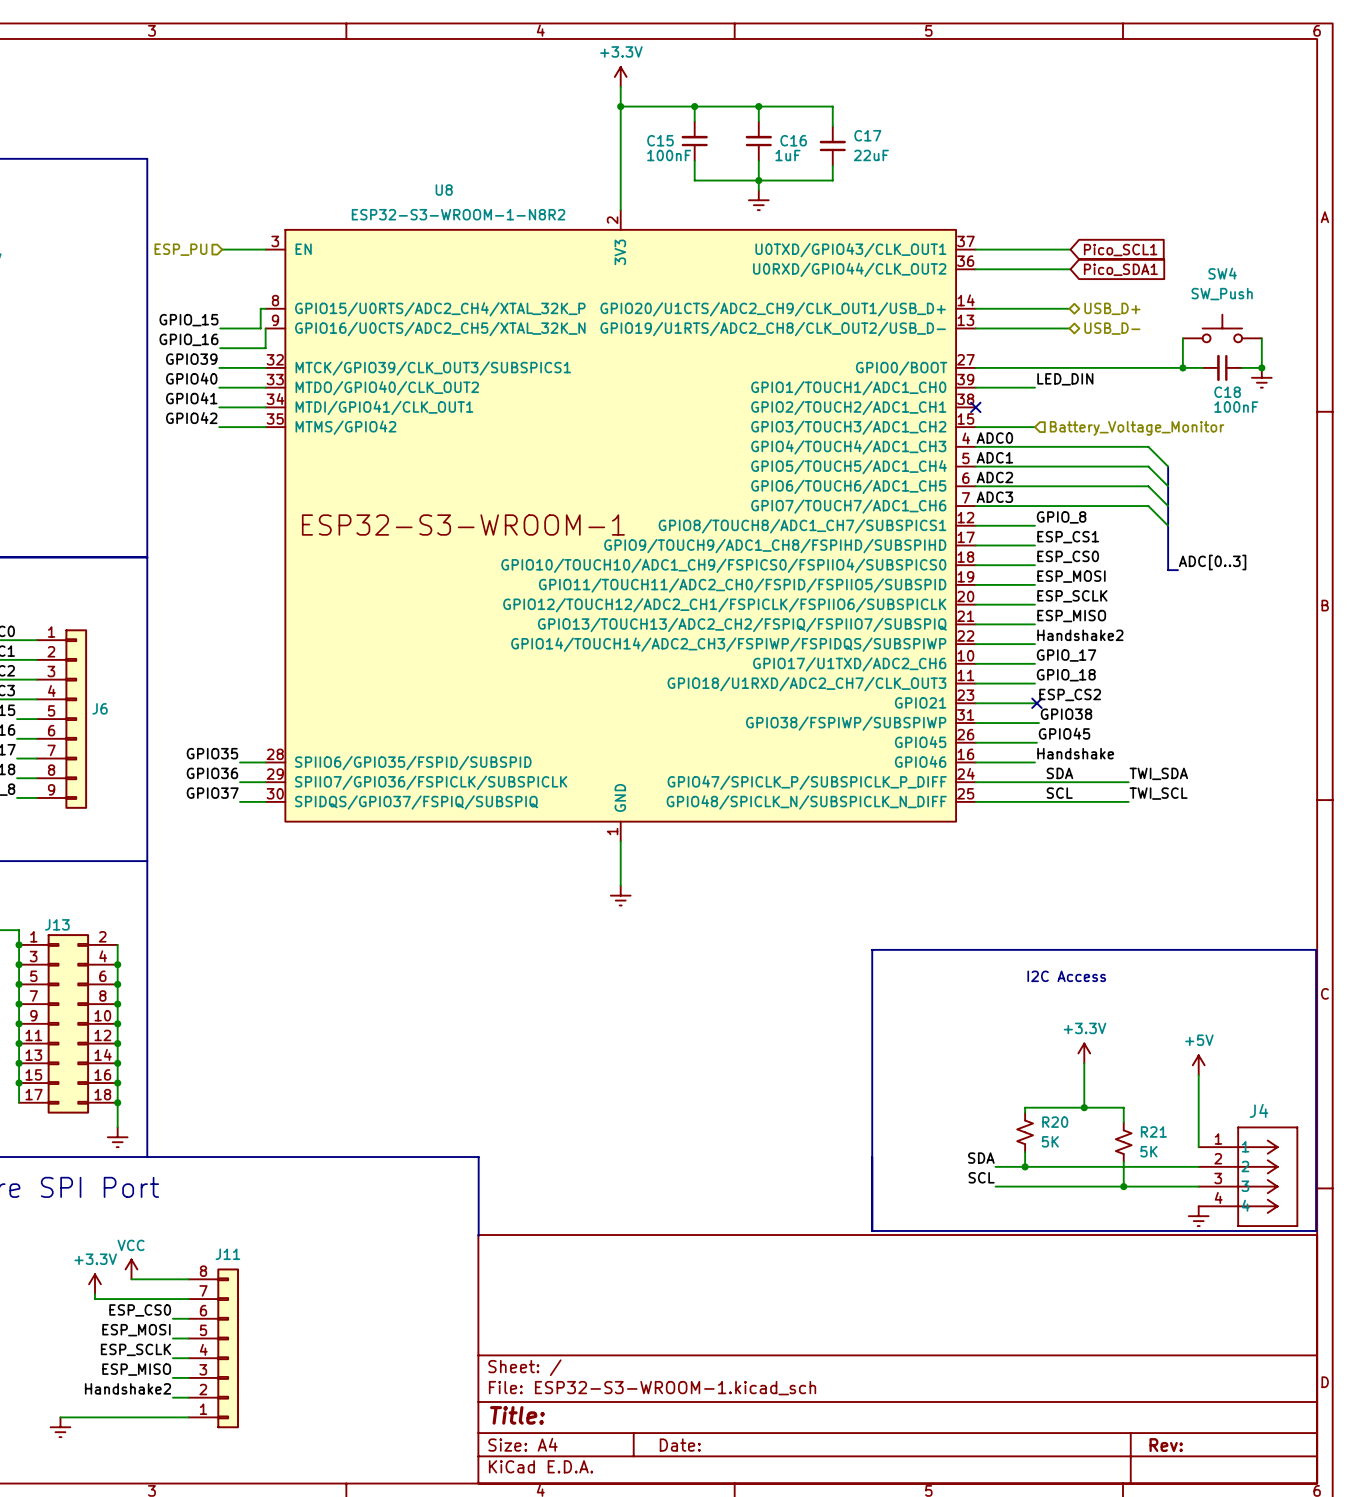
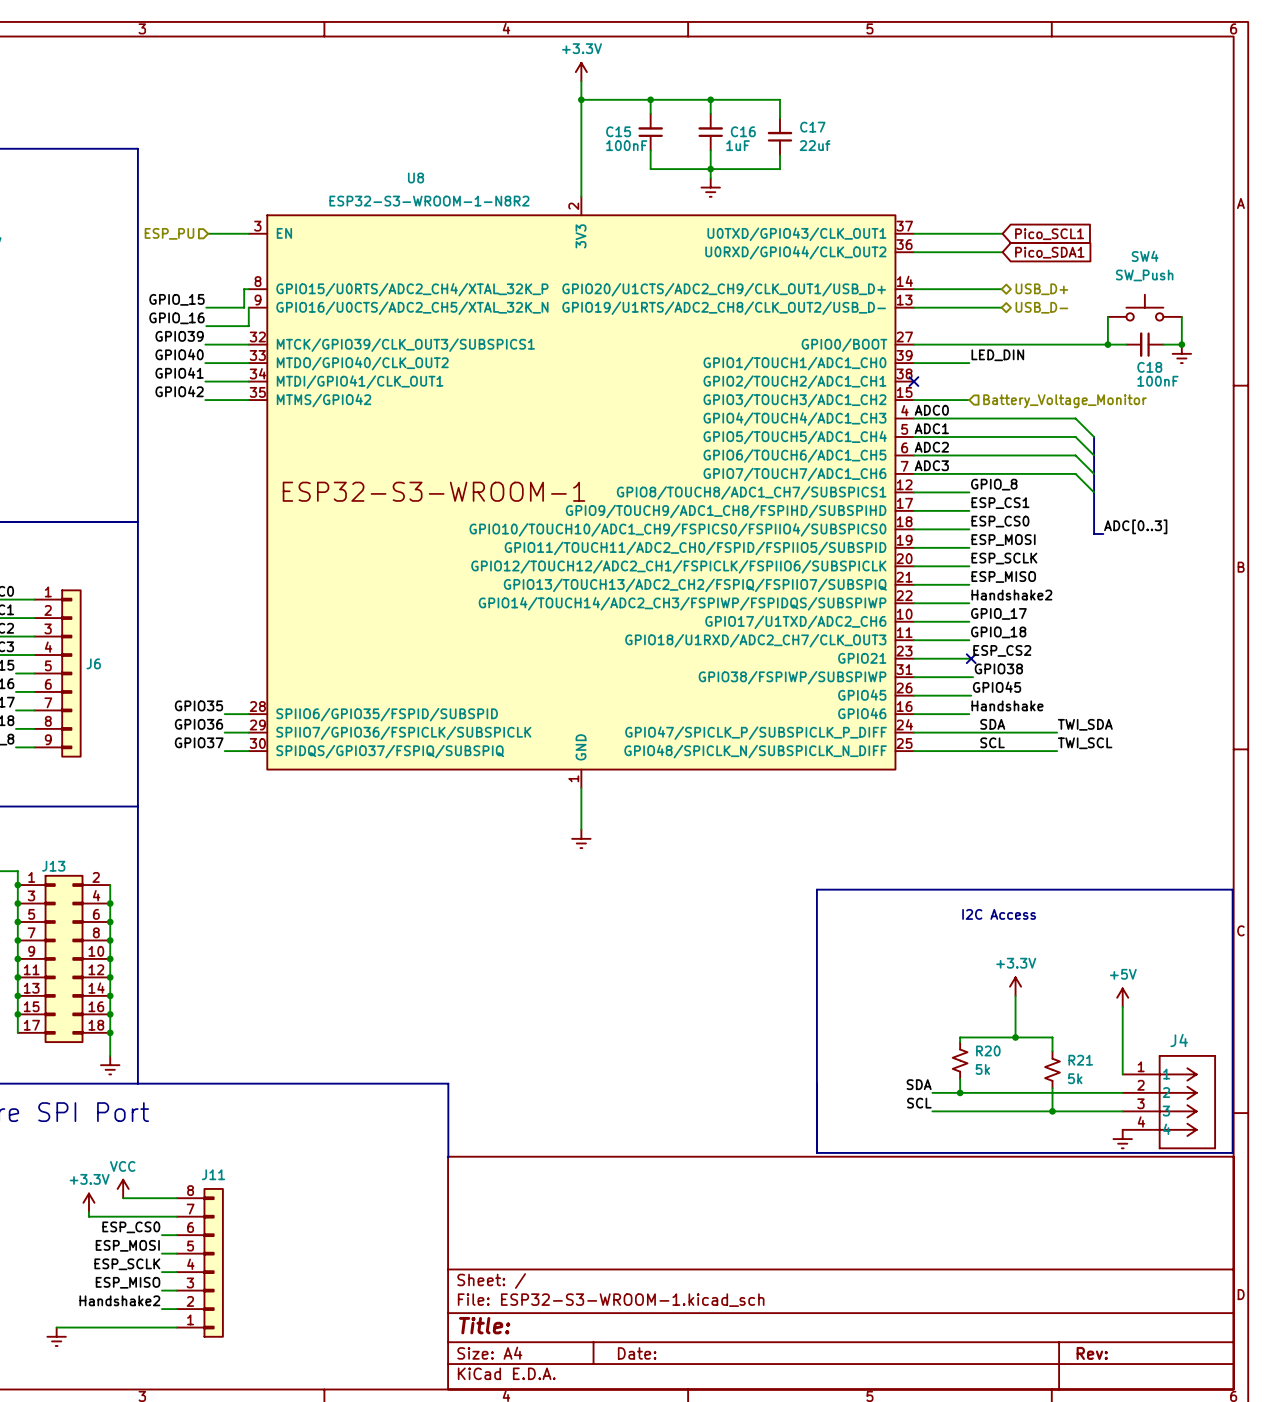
C17 value: 22uF (871, 155) -> 22uf (815, 145)
R20 value: 5K (1050, 1141) -> 5k (982, 1069)
R21 value: 5K (1148, 1151) -> 5k (1075, 1078)

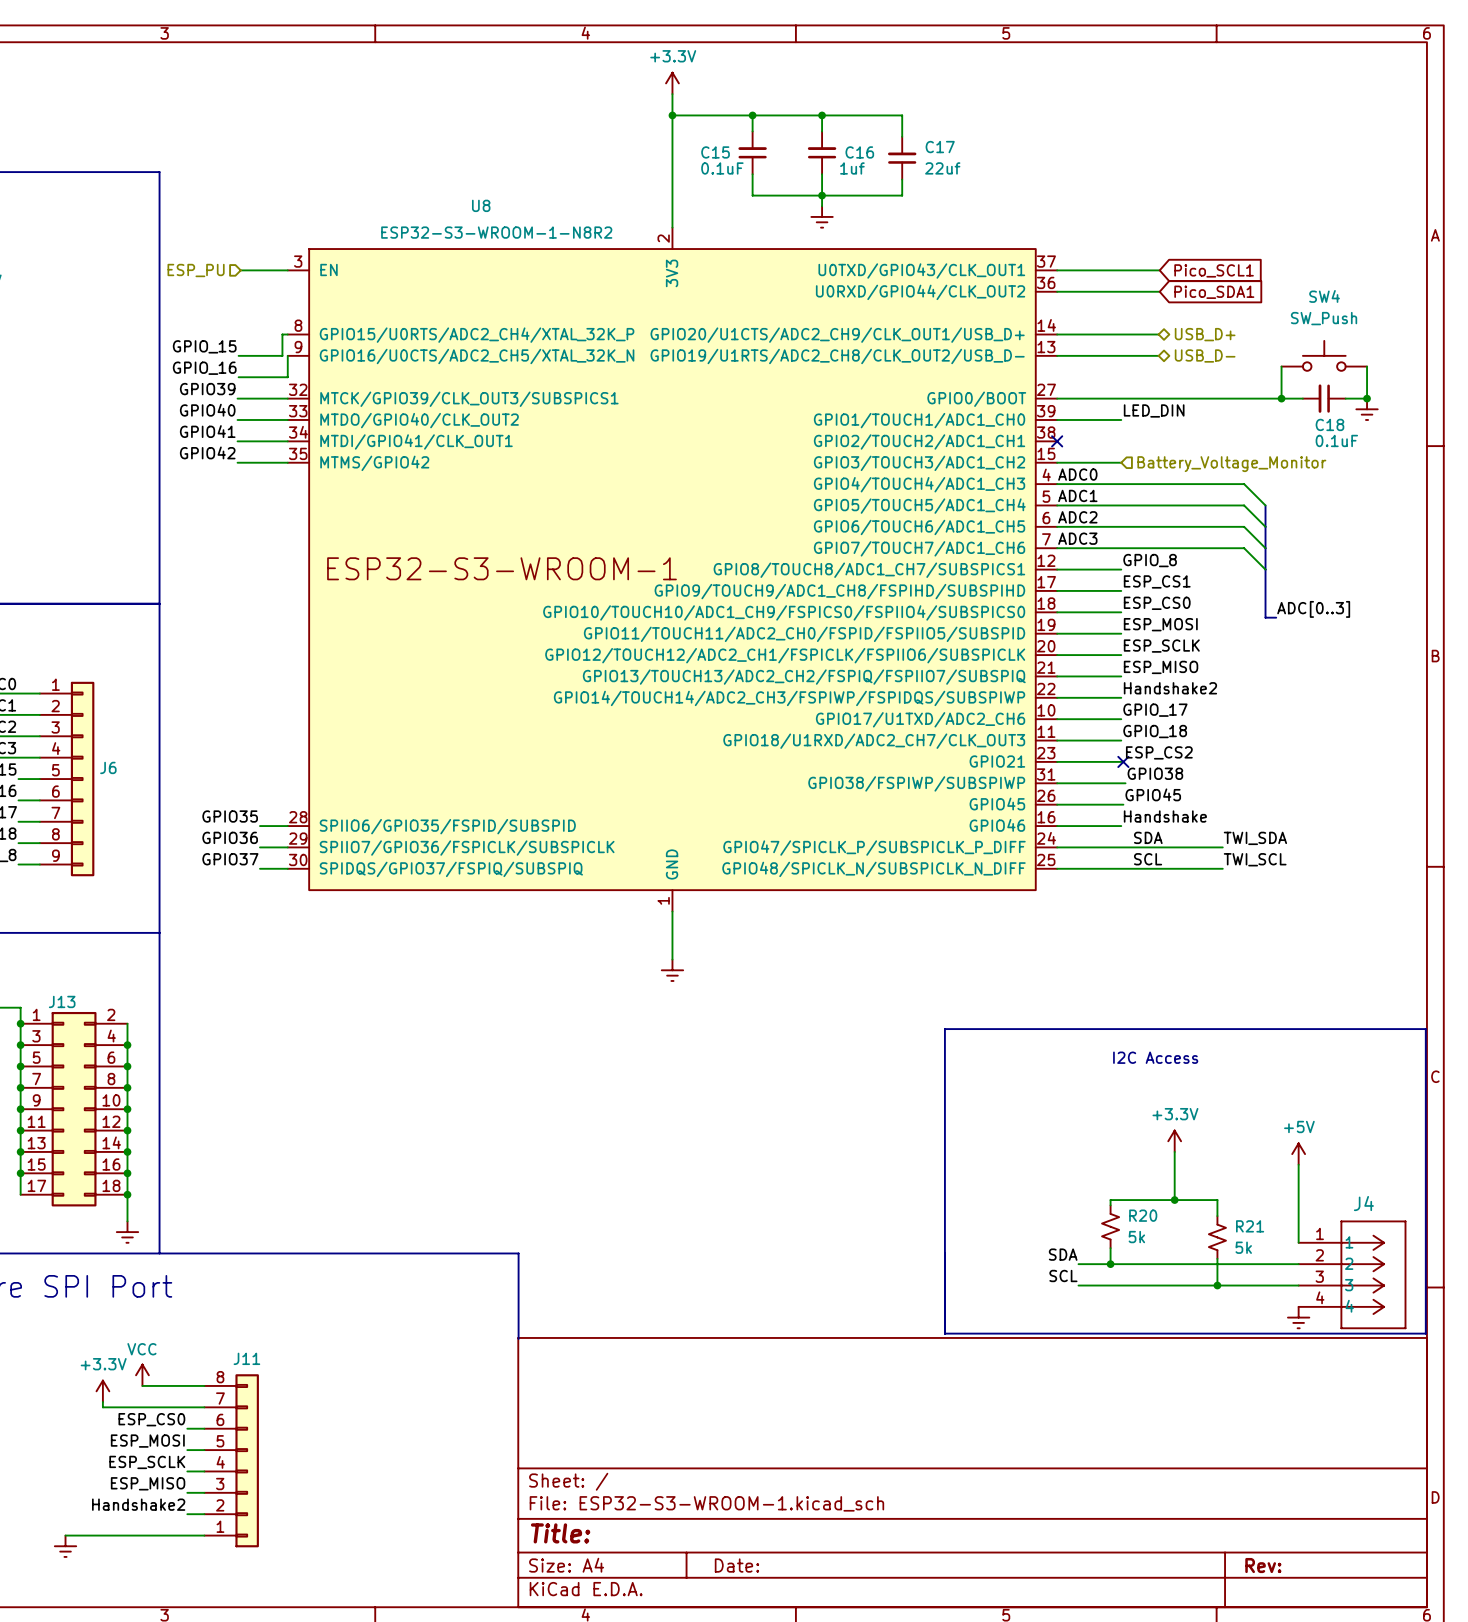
C15 value: 100nF (626, 145) -> 0.1uF (722, 168)
C16 value: 1uF (738, 145) -> 1uf (852, 168)
C18 value: 100nF (1157, 381) -> 0.1uF (1336, 440)

